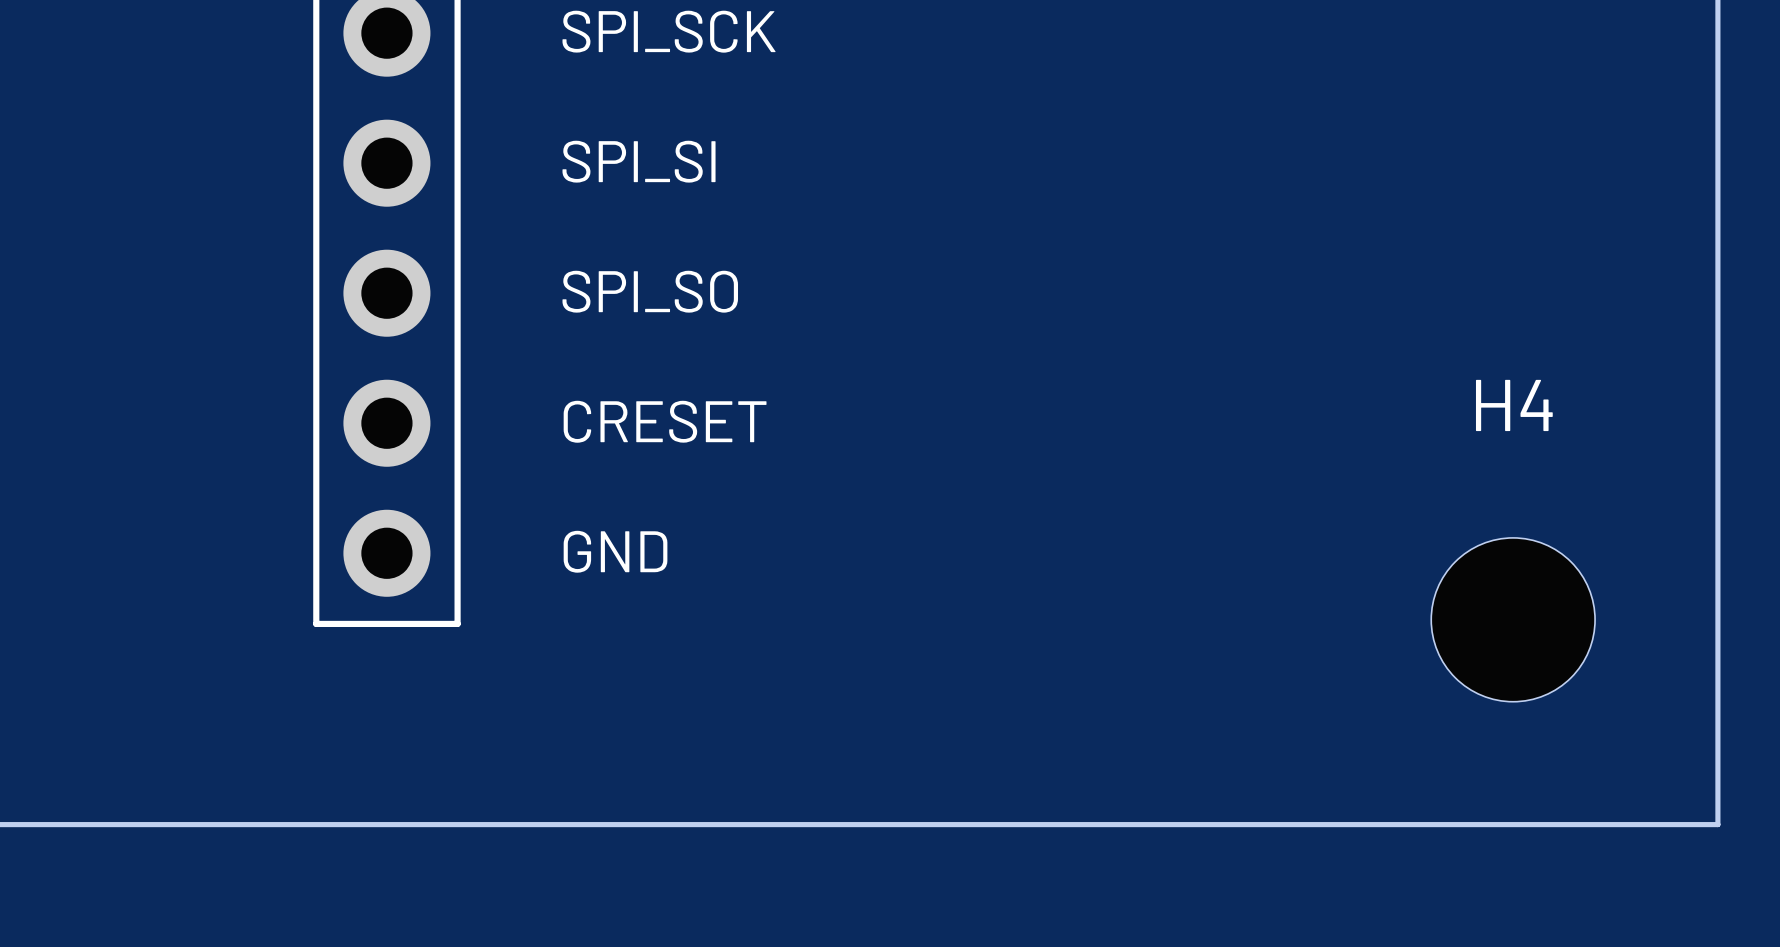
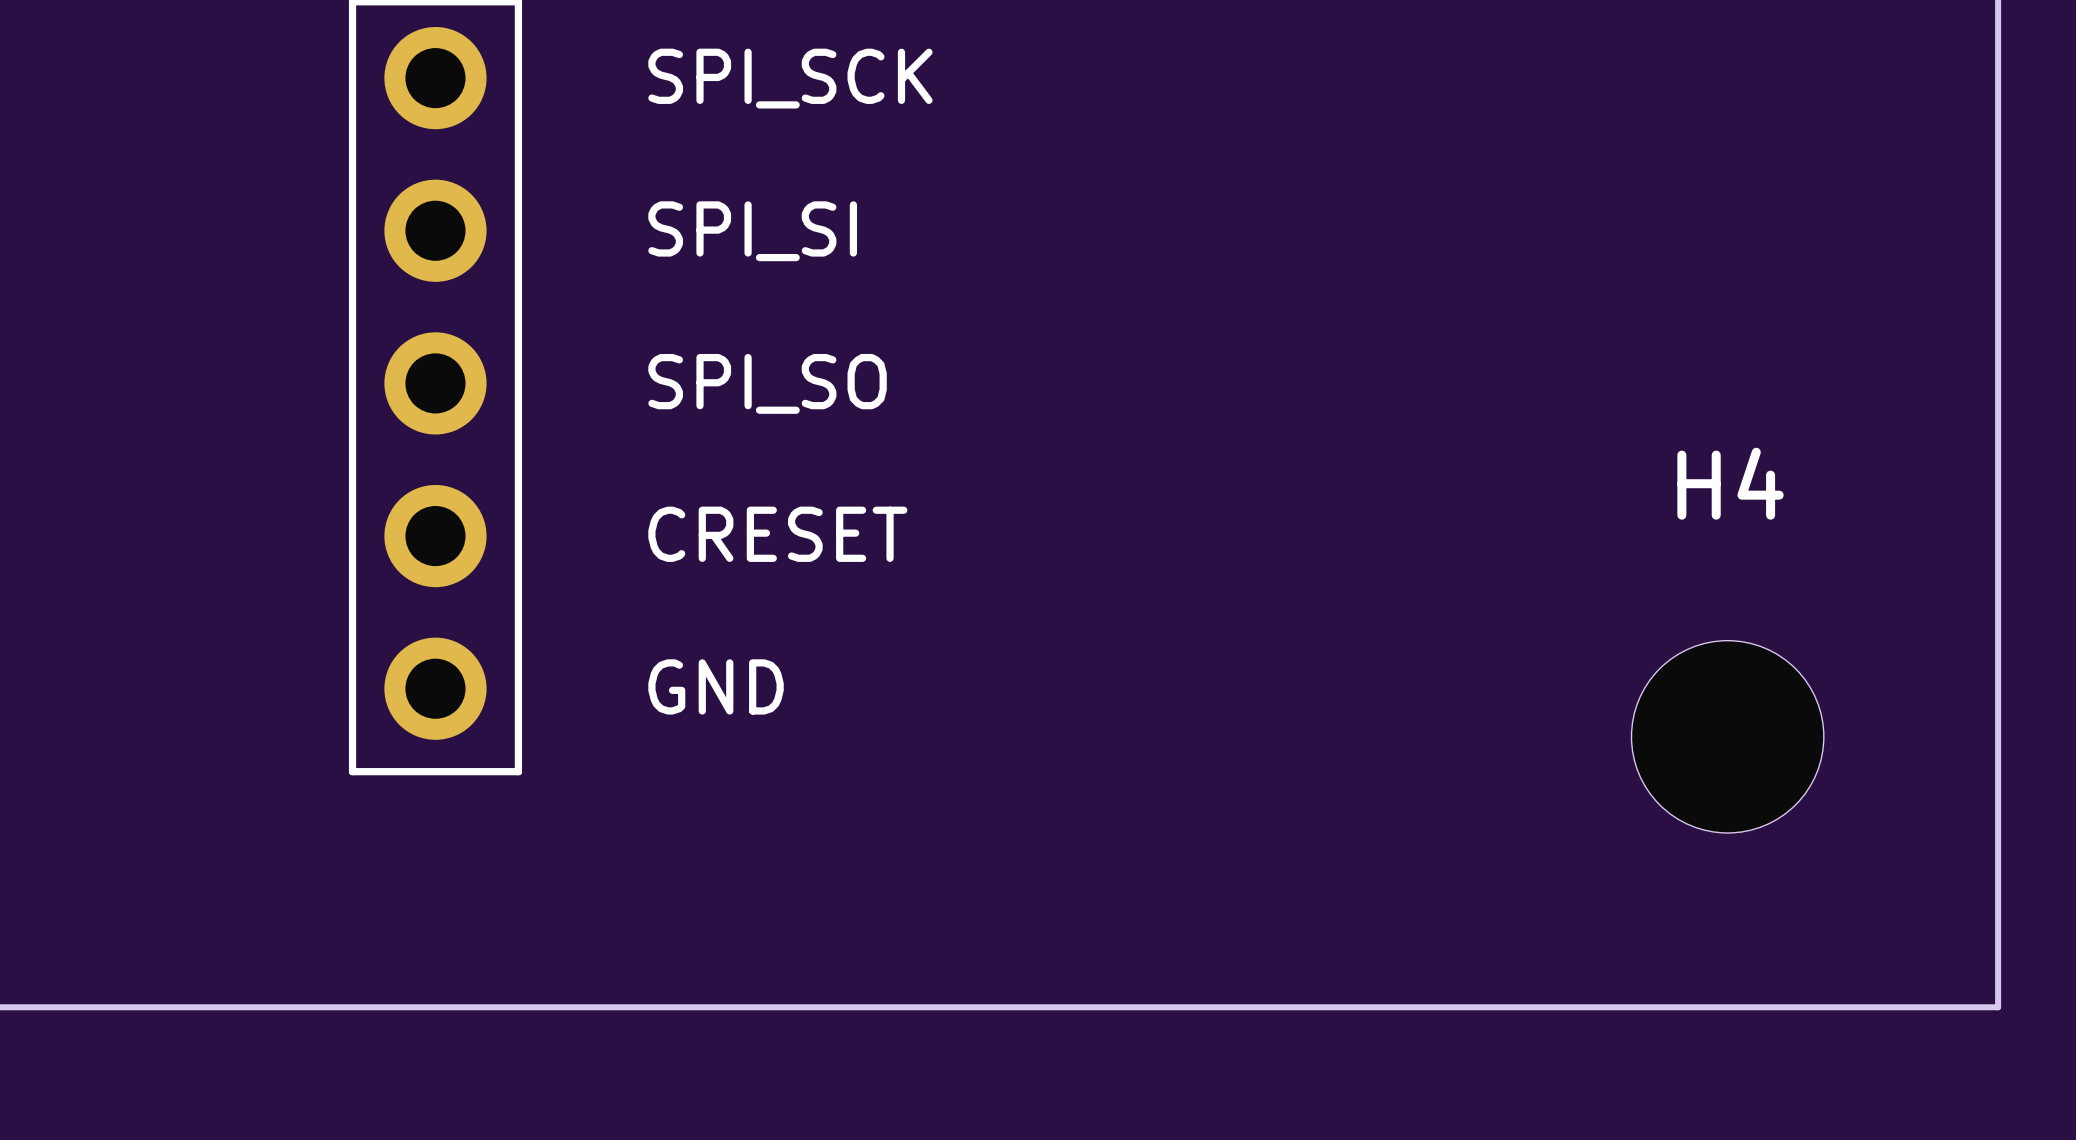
H4 position: (1513, 619) -> (1727, 736)

